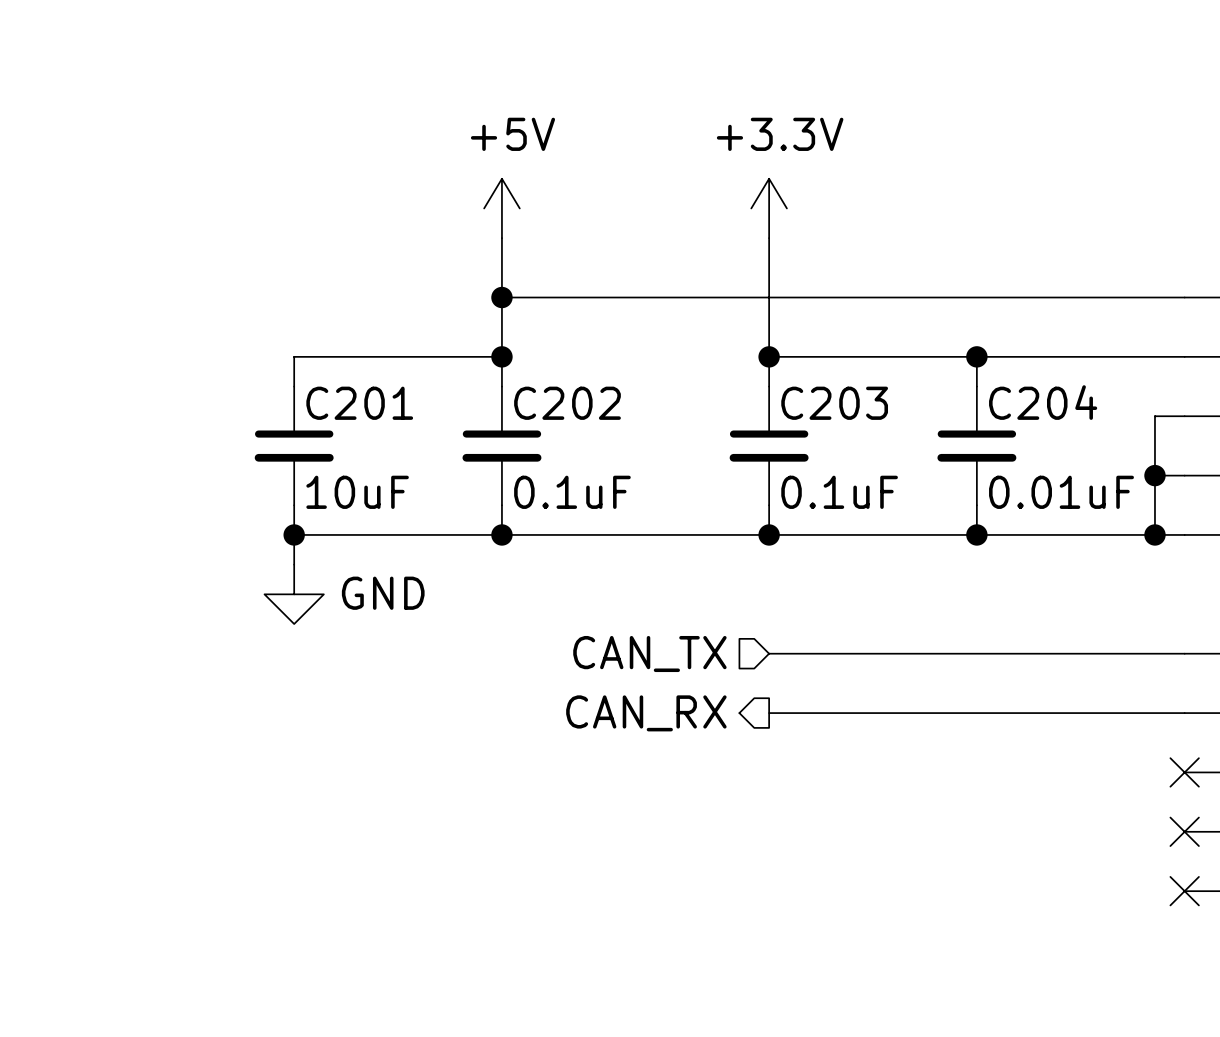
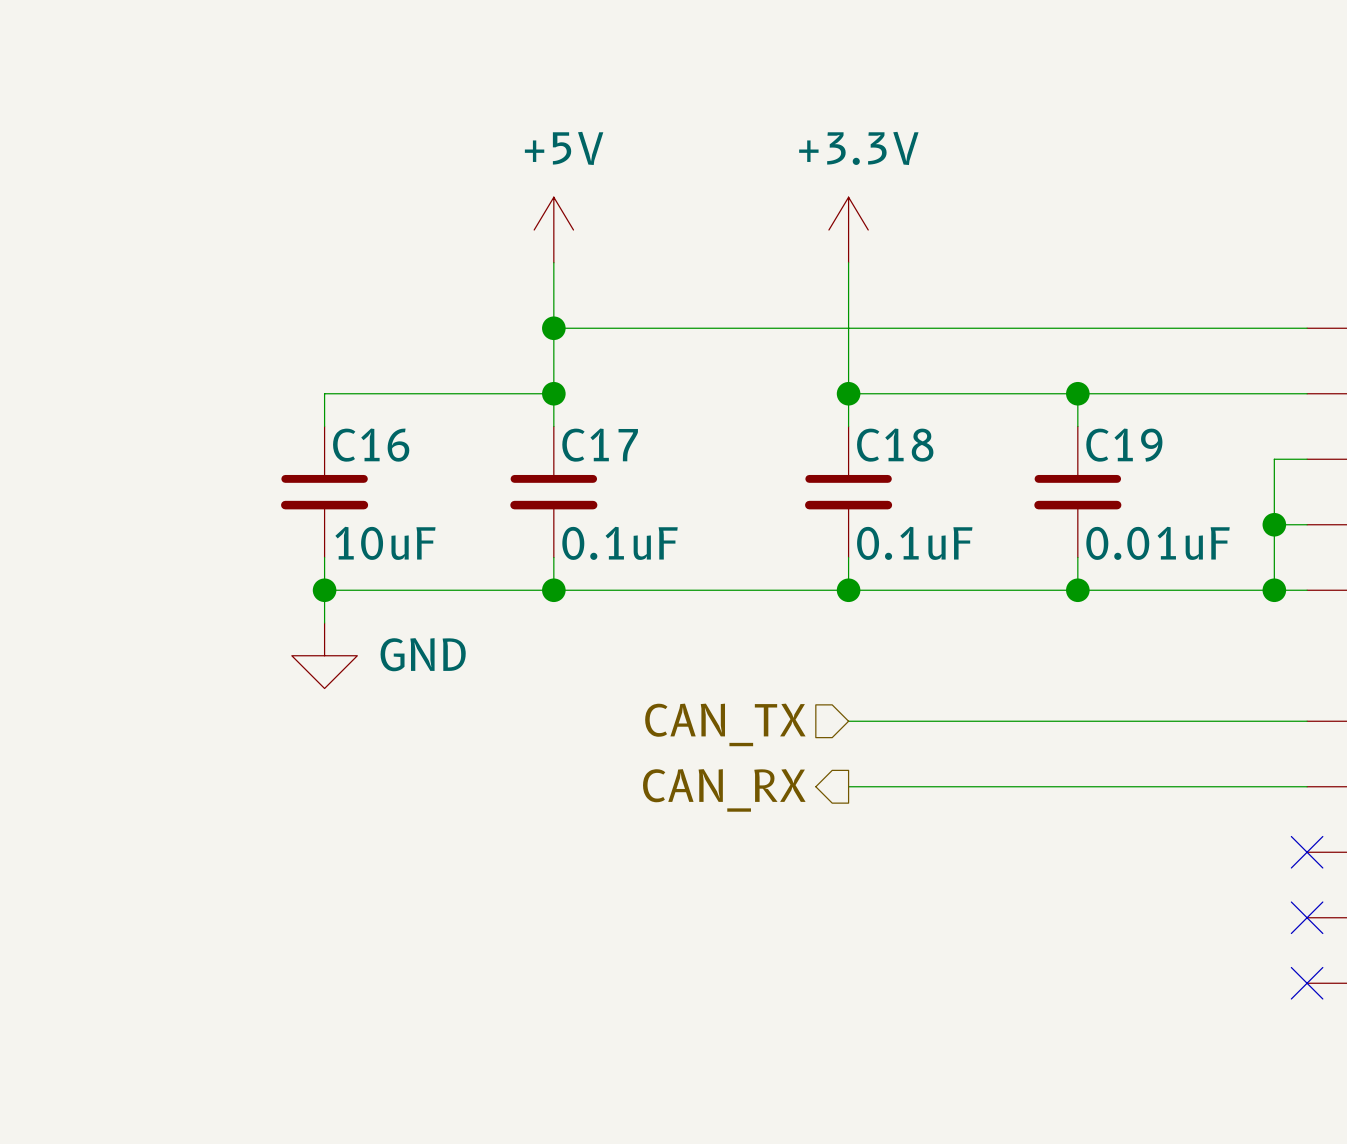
C204 name: C204 (1043, 402) -> C19 (1124, 445)
C201 name: C201 (359, 403) -> C16 (371, 445)
C202 name: C202 (567, 403) -> C17 (600, 445)
C203 name: C203 (834, 403) -> C18 (895, 445)

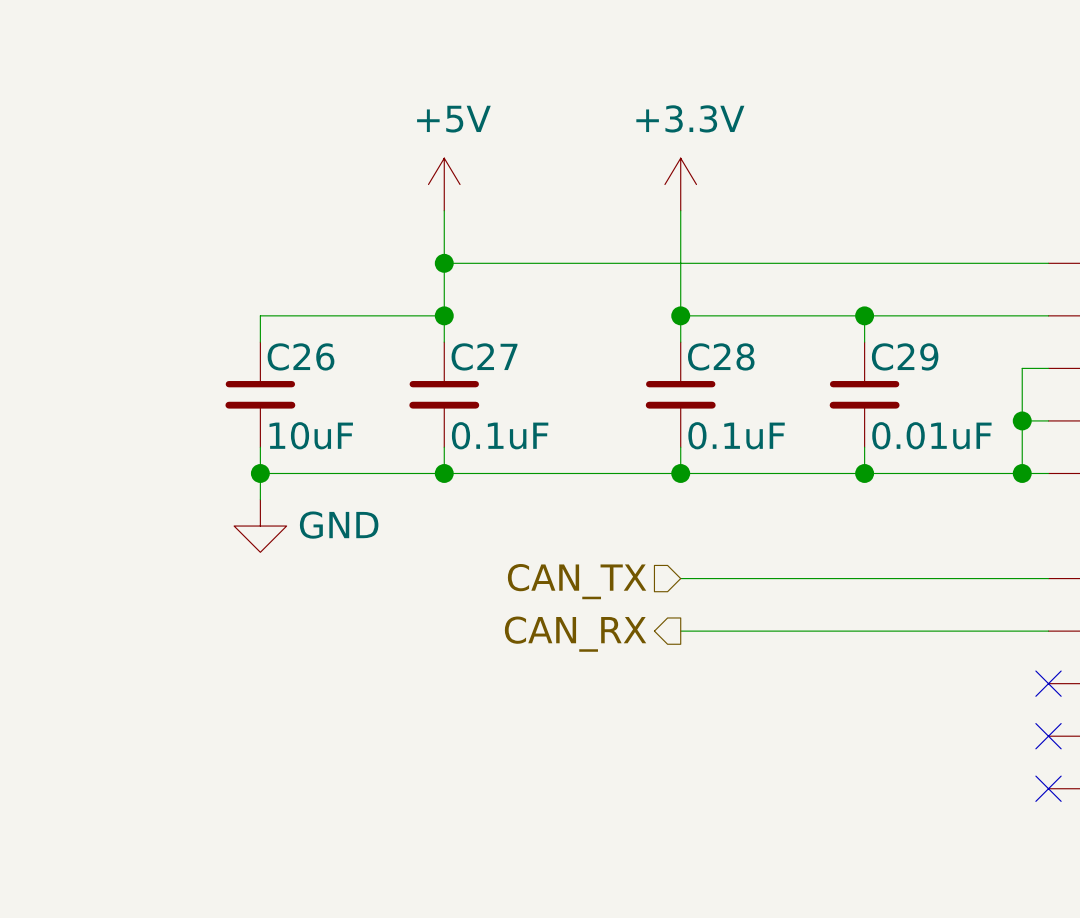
C16 name: C16 (371, 445) -> C26 (301, 356)
C17 name: C17 (600, 445) -> C27 (484, 356)
C18 name: C18 (895, 445) -> C28 (721, 356)
C19 name: C19 (1124, 445) -> C29 (905, 356)

